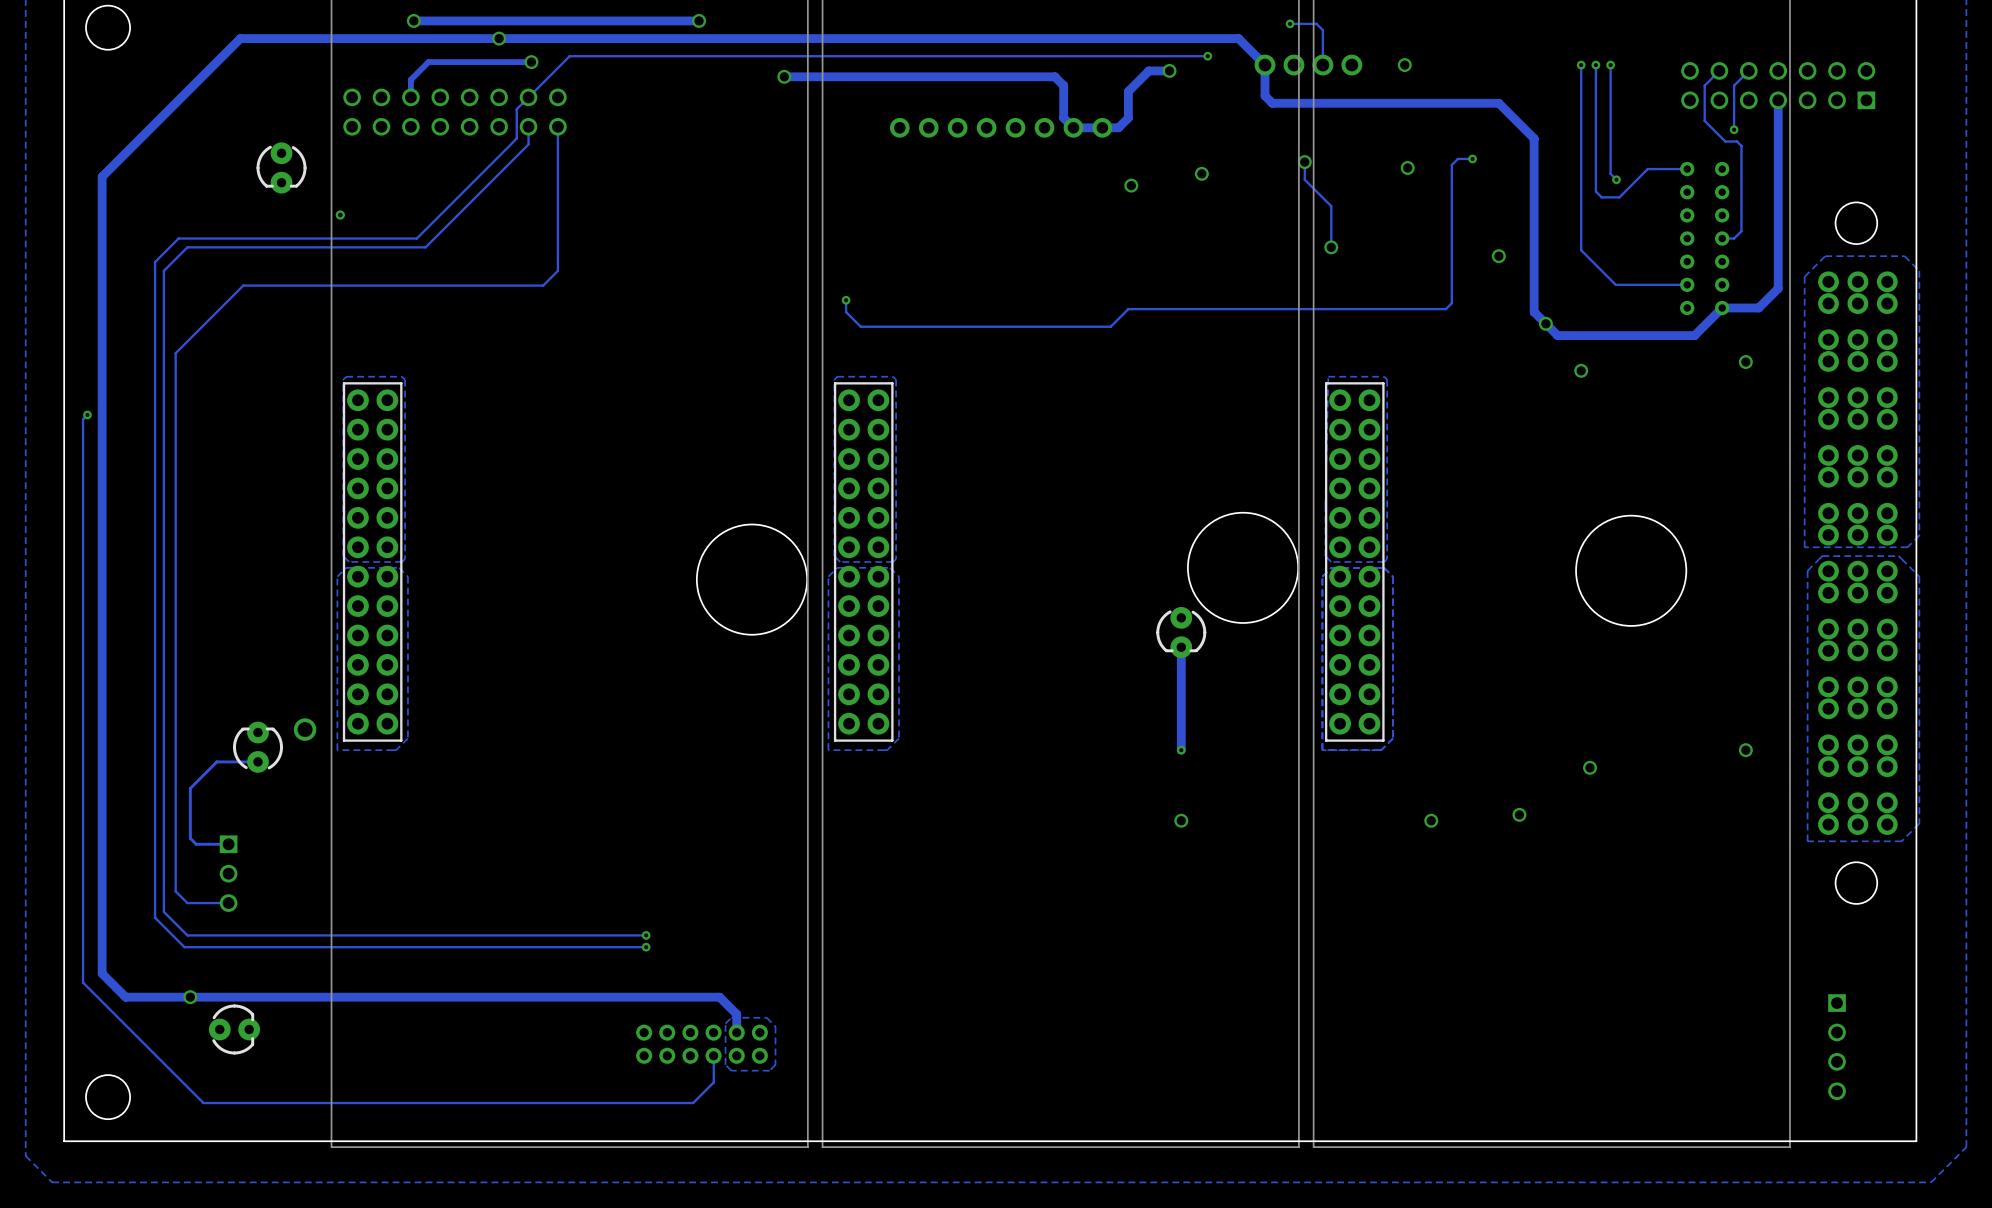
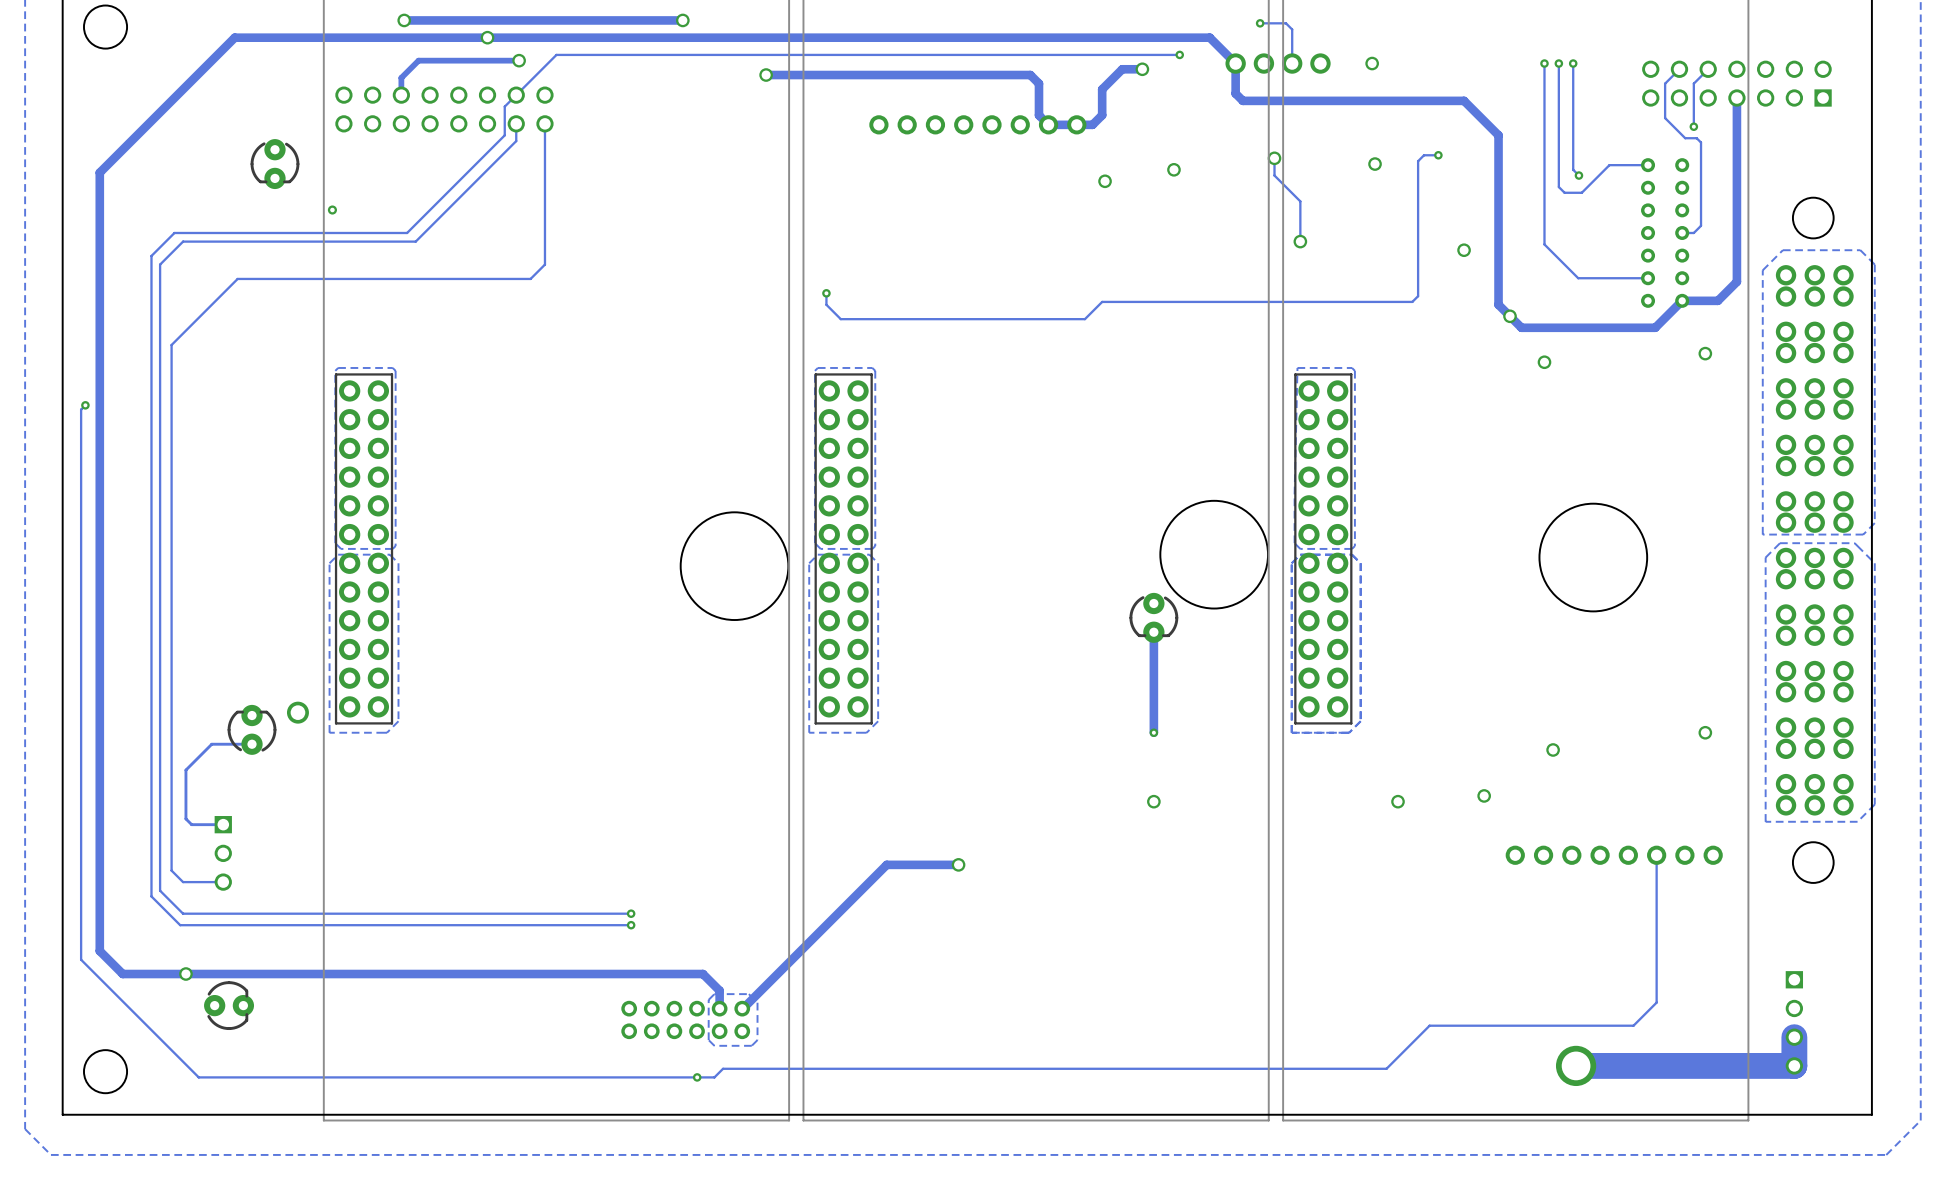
part: none -> (1614, 855)
track: none -> (958, 864) (886, 864) (742, 1008)
via: none -> (958, 864)
track: (713, 1055) (713, 1082) (693, 1103) -> (1656, 855) (1656, 1002) (1633, 1025) (1429, 1025) (1386, 1068) (723, 1068) (714, 1077) (677, 1077)
track: none -> (1794, 1037) (1794, 1065) (1576, 1065)
via: none -> (1576, 1065)
via: none -> (697, 1077)

